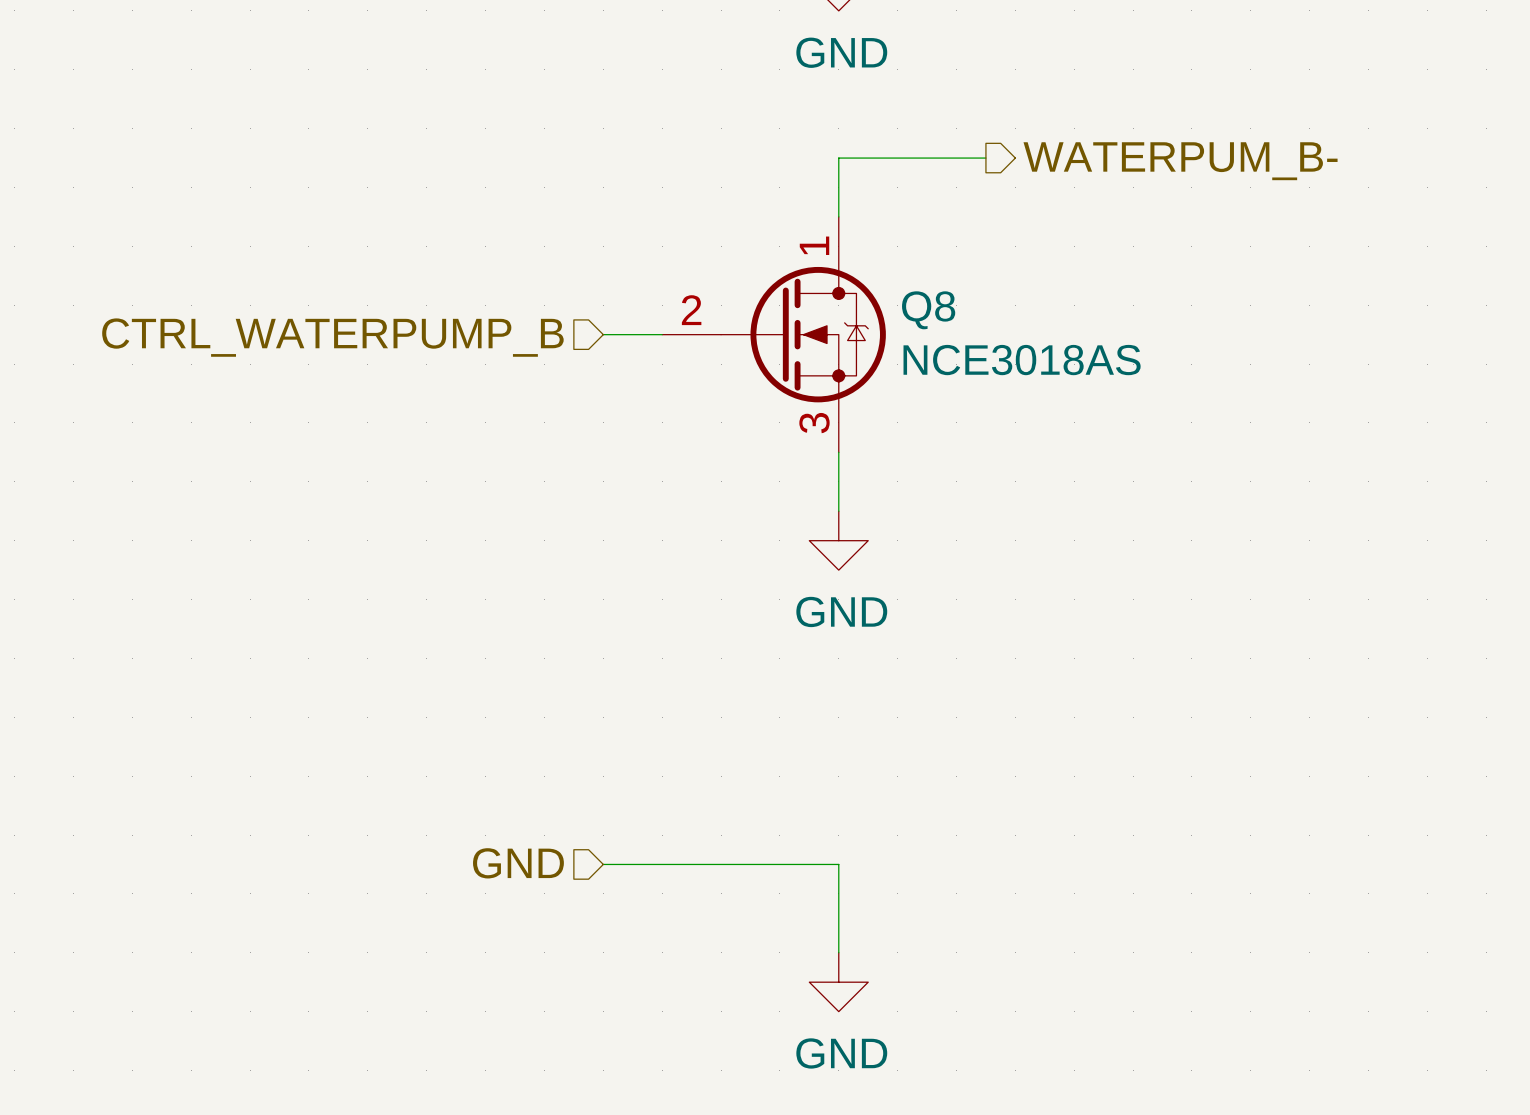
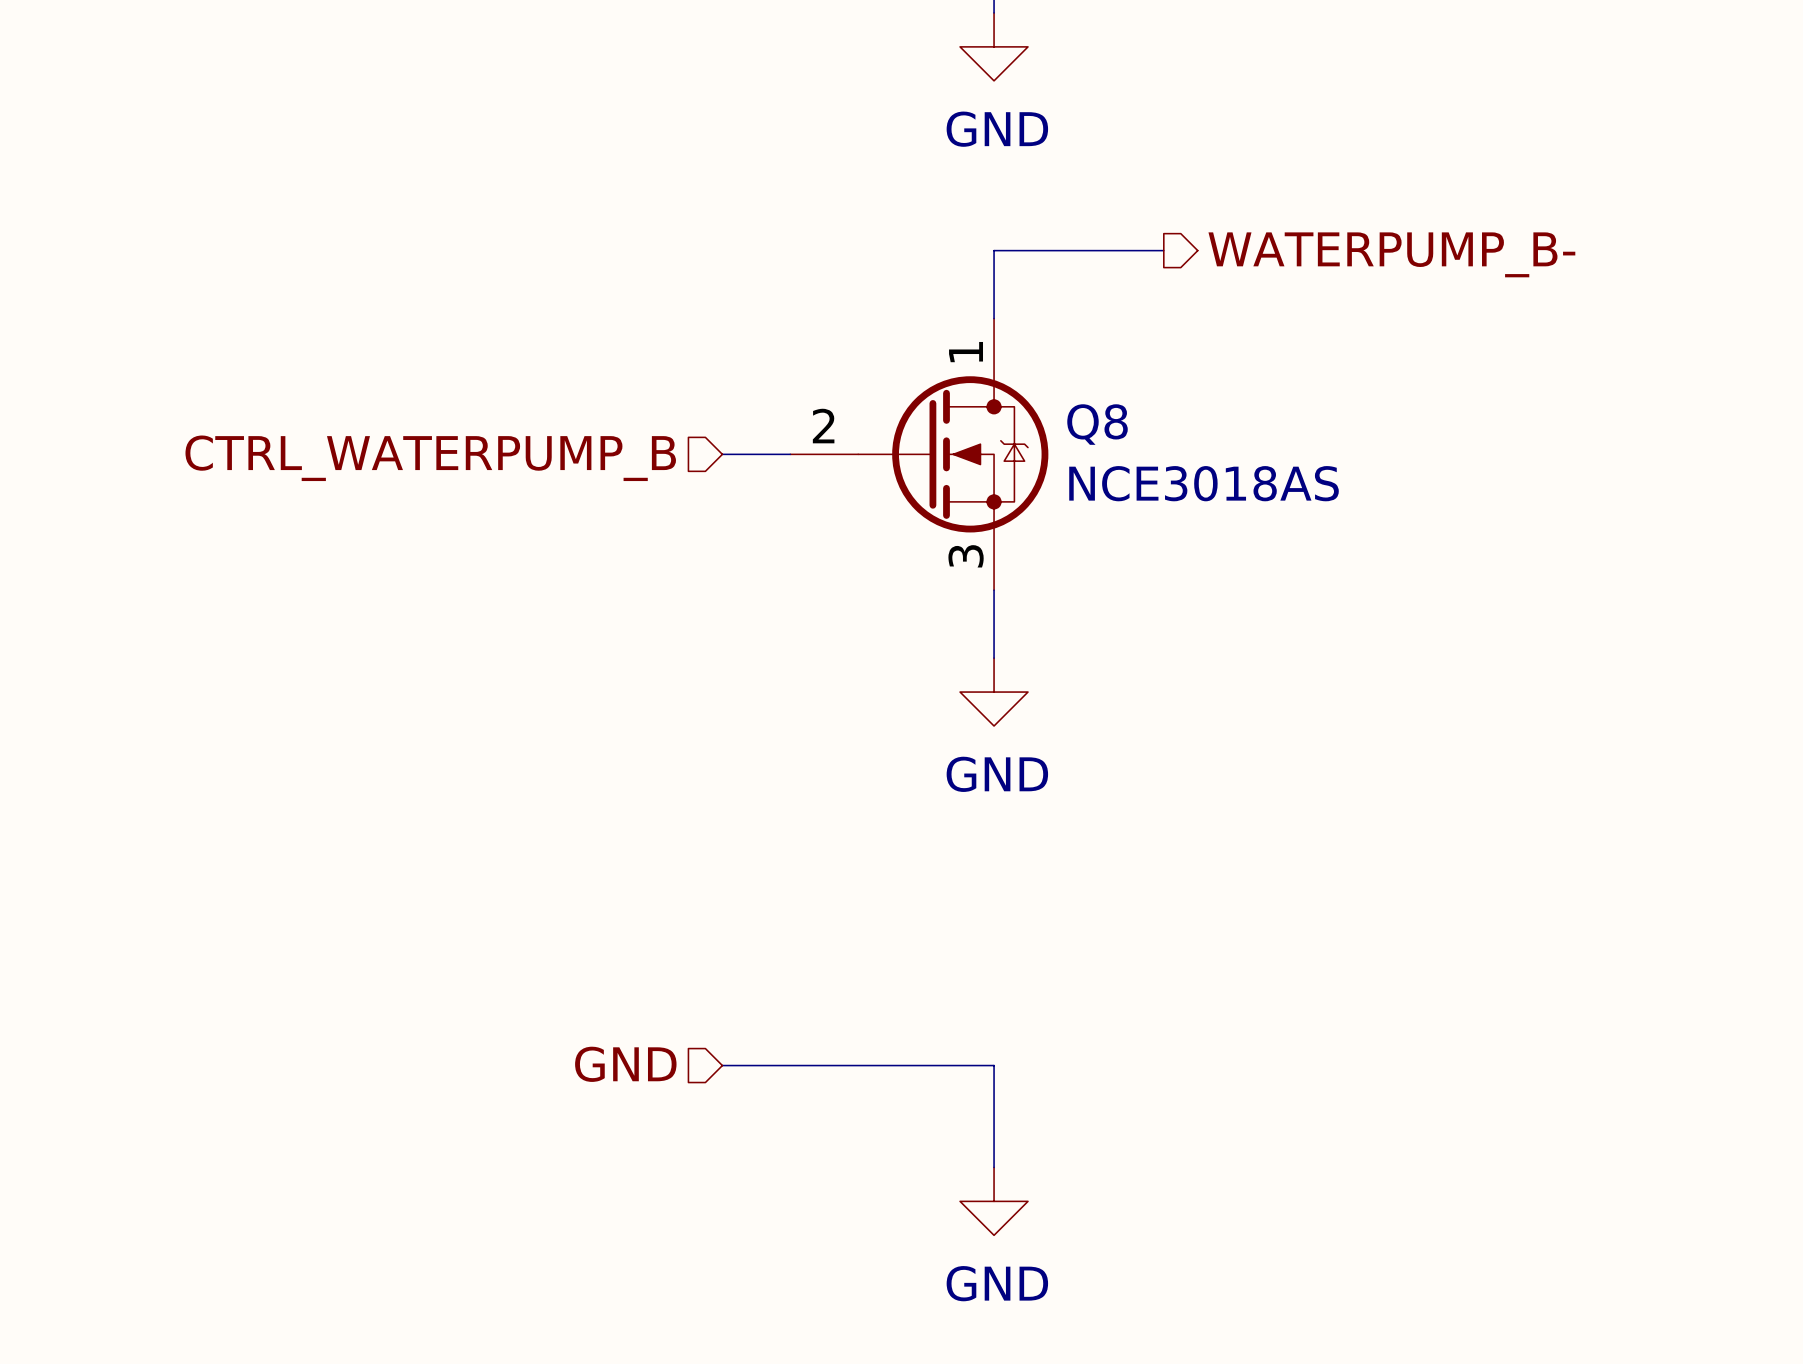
hierarchical label: WATERPUM_B- (1180, 161) -> WATERPUMP_B- (1391, 254)

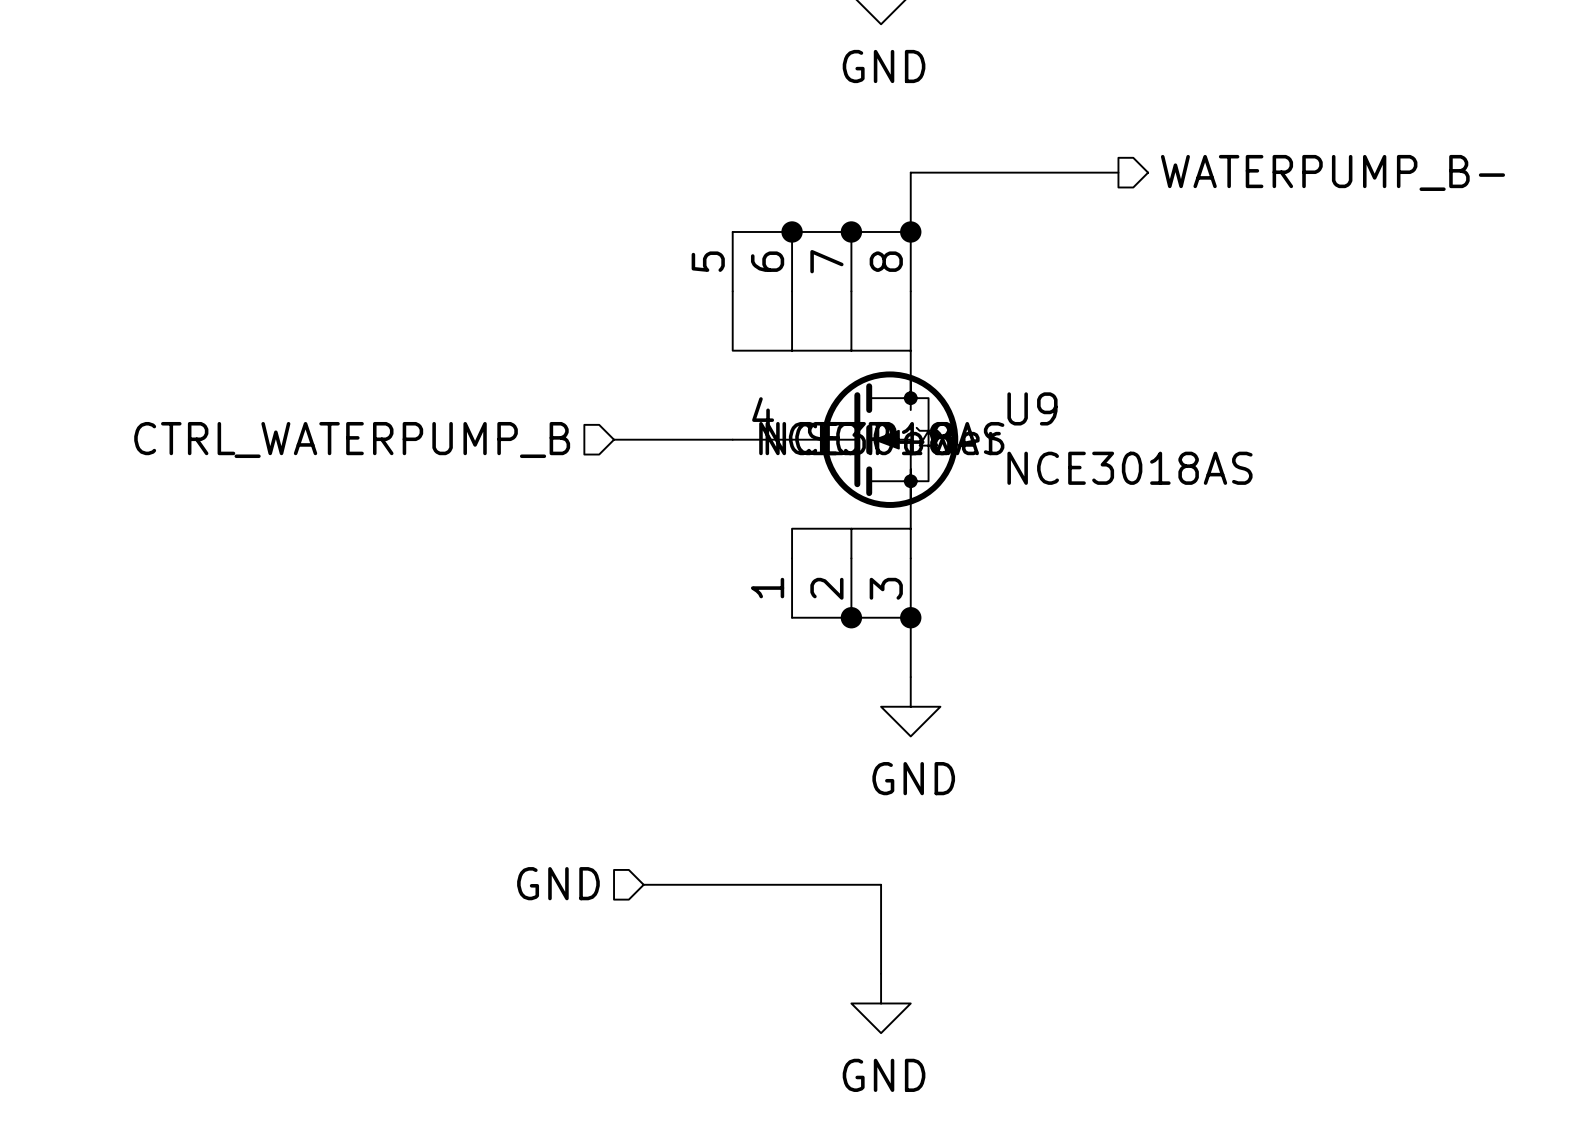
wire: (1027, 250) (994, 250) (994, 318) -> (910, 172) (910, 231) (732, 231)
wire: none -> (1029, 172) (1118, 172)
hierarchical label position: WATERPUMP_B- (1391, 254) -> WATERPUMP_B- (1332, 172)
junction: none -> (792, 231)
junction: none -> (851, 231)
junction: none -> (910, 231)
wire: (722, 454) (790, 454) -> none
Q8: NCE3018AS (919, 454) -> none
hierarchical label position: CTRL_WATERPUMP_B (430, 458) -> CTRL_WATERPUMP_B (352, 440)
U9: none -> NCE3018AS (845, 424)
wire: none -> (614, 439) (732, 439)
wire: (994, 590) (994, 658) -> none
power symbol position: GND (994, 692) -> GND (910, 706)
wire: none -> (792, 617) (910, 617) (910, 677)
junction: none -> (851, 617)
junction: none -> (910, 617)

